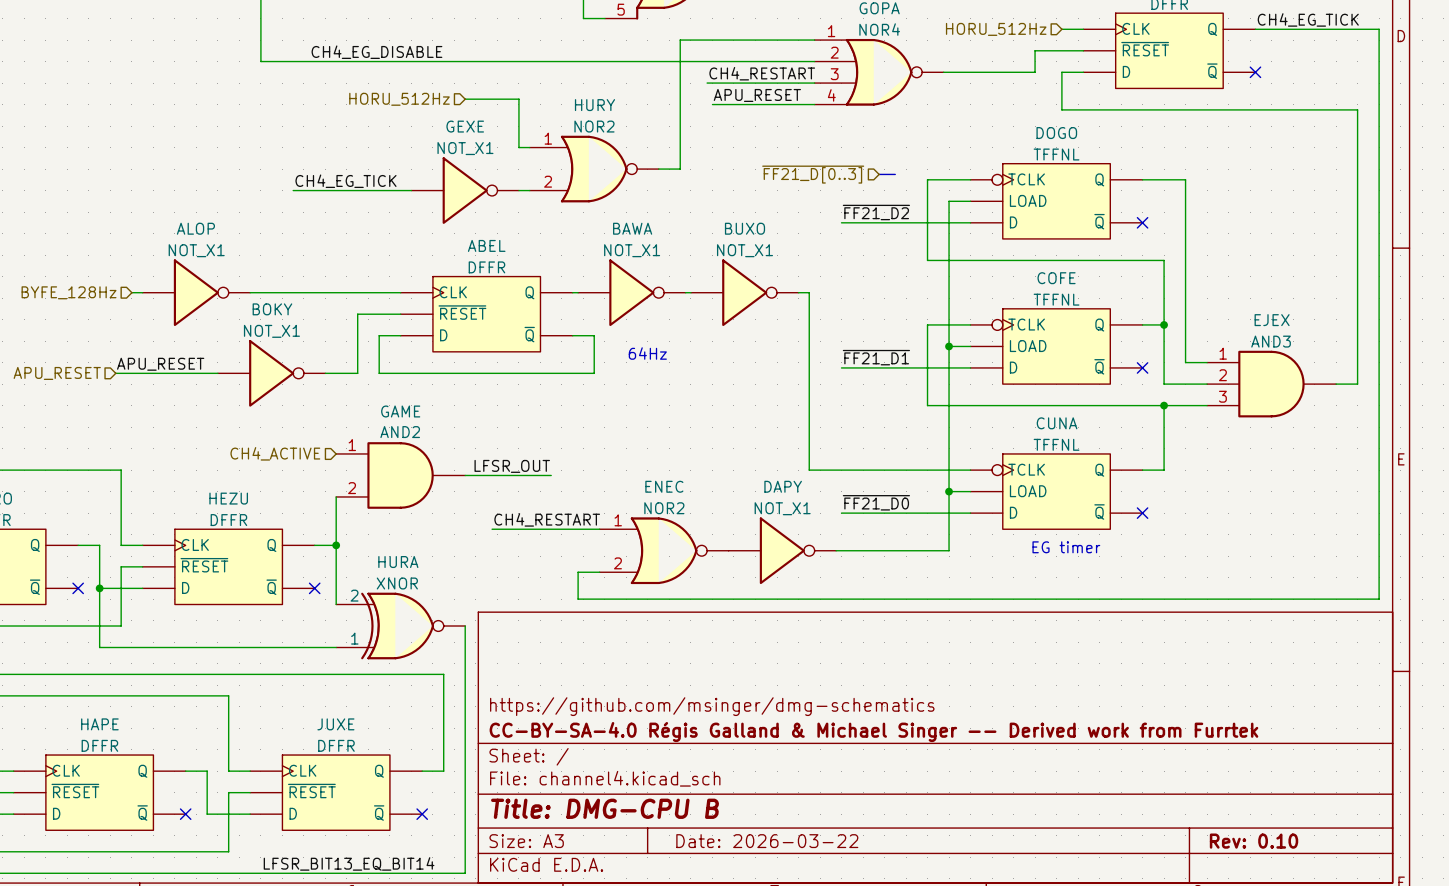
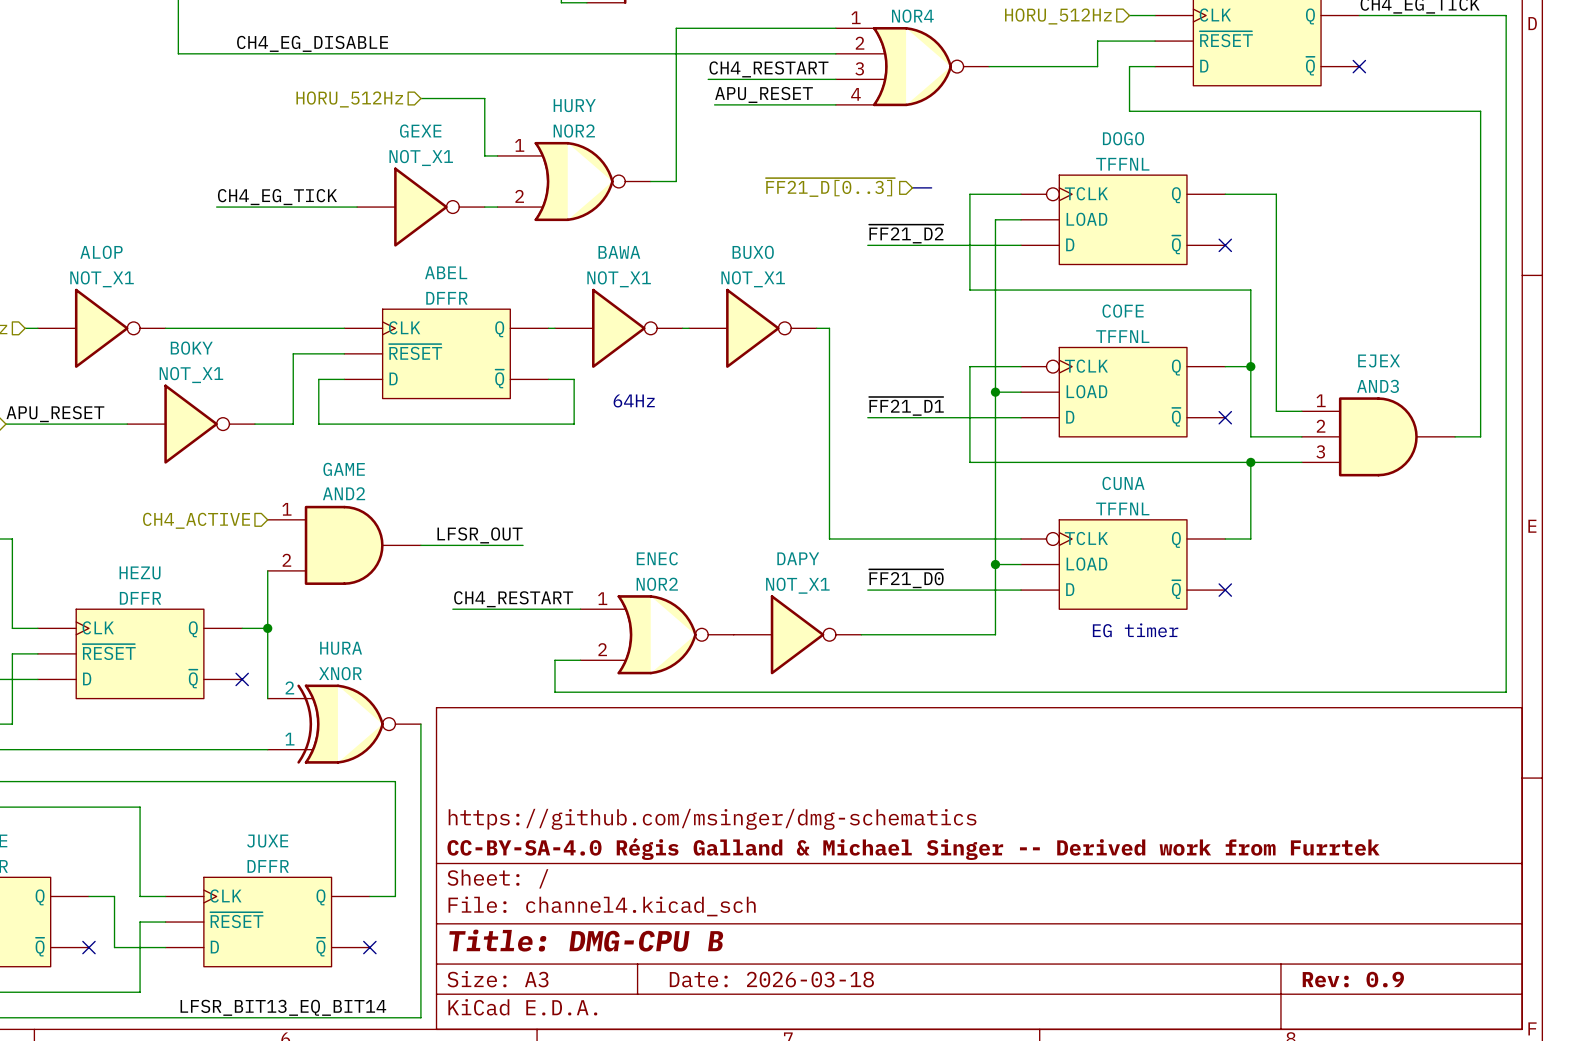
title block: Date: 2026-03-22 (767, 841) -> Date: 2026-03-18 (771, 979)
title block: Rev: 0.10 (1254, 841) -> Rev: 0.9 (1353, 979)

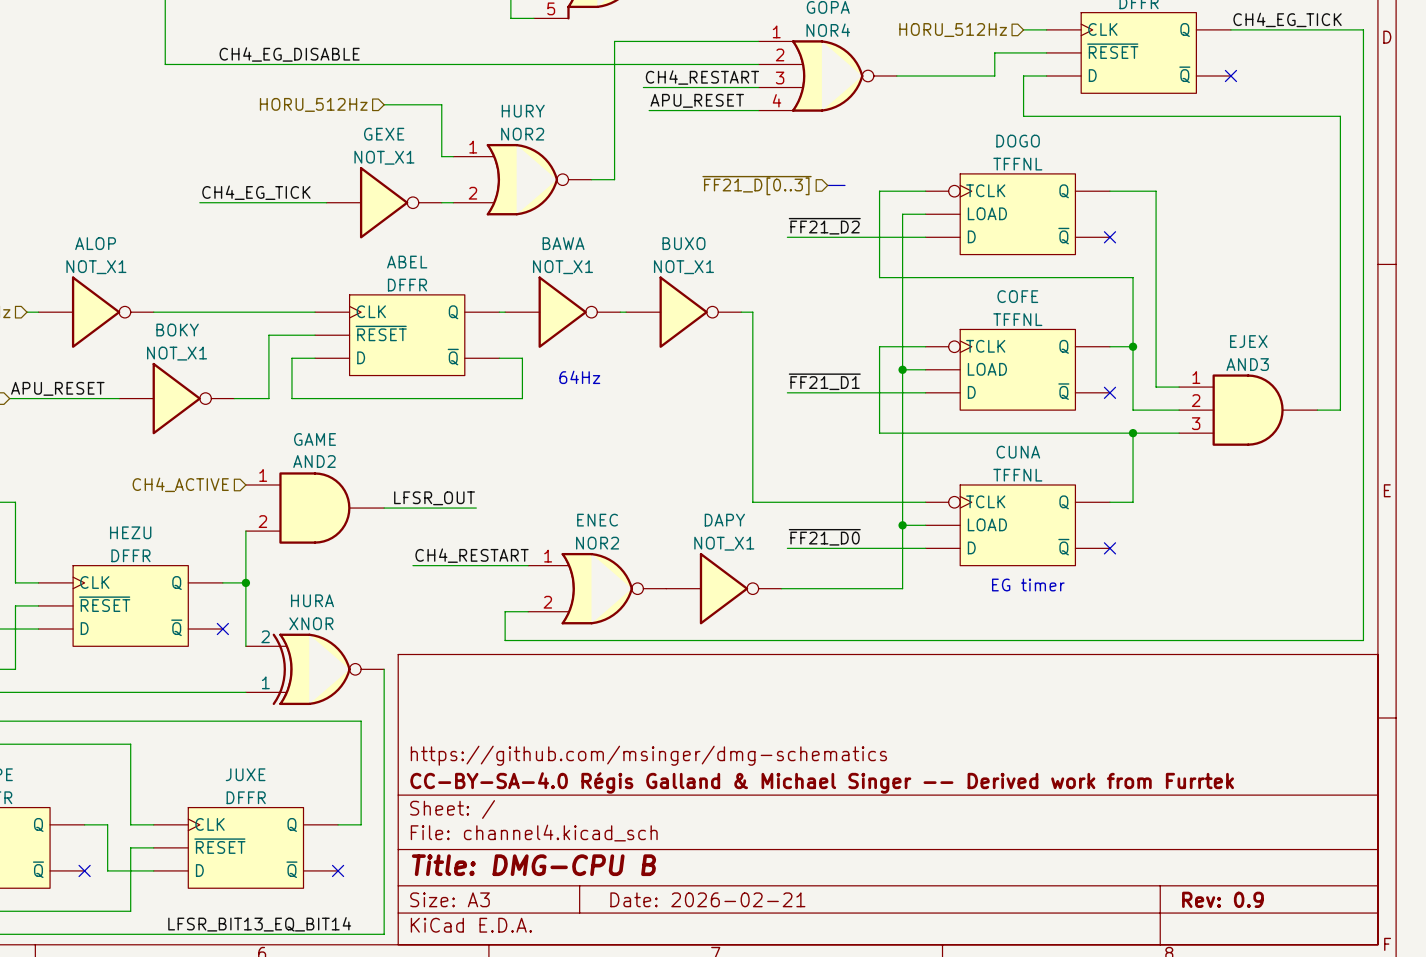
title block: Date: 2026-03-18 (771, 979) -> Date: 2026-02-21 (707, 899)

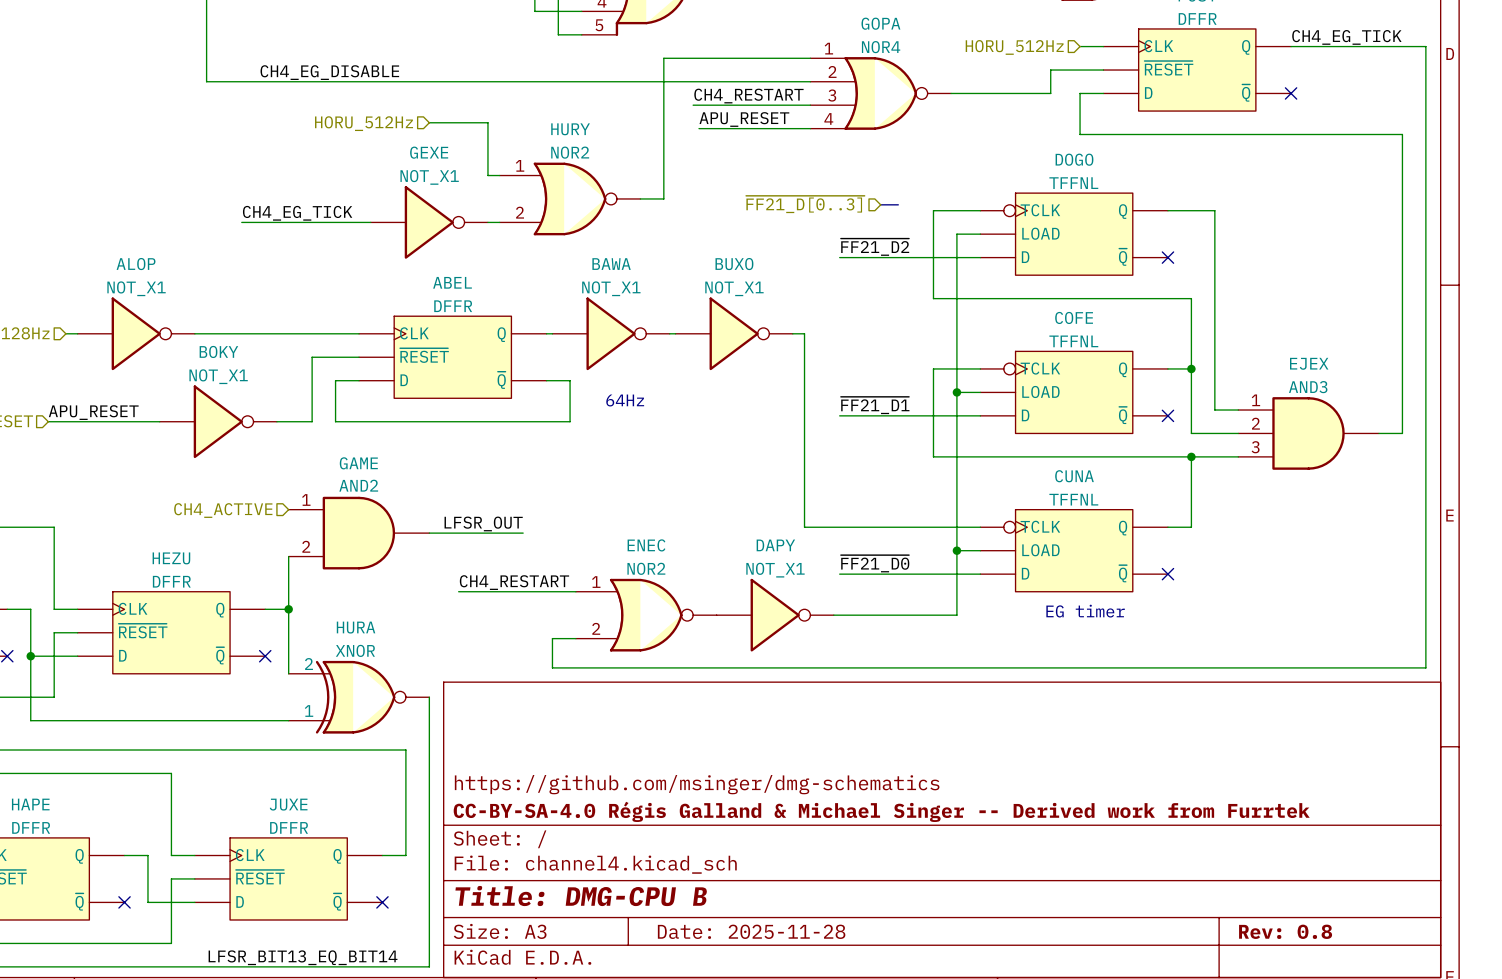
title block: Date: 2026-02-21 (707, 899) -> Date: 2025-11-28 (751, 931)
title block: Rev: 0.9 (1222, 899) -> Rev: 0.8 (1285, 931)

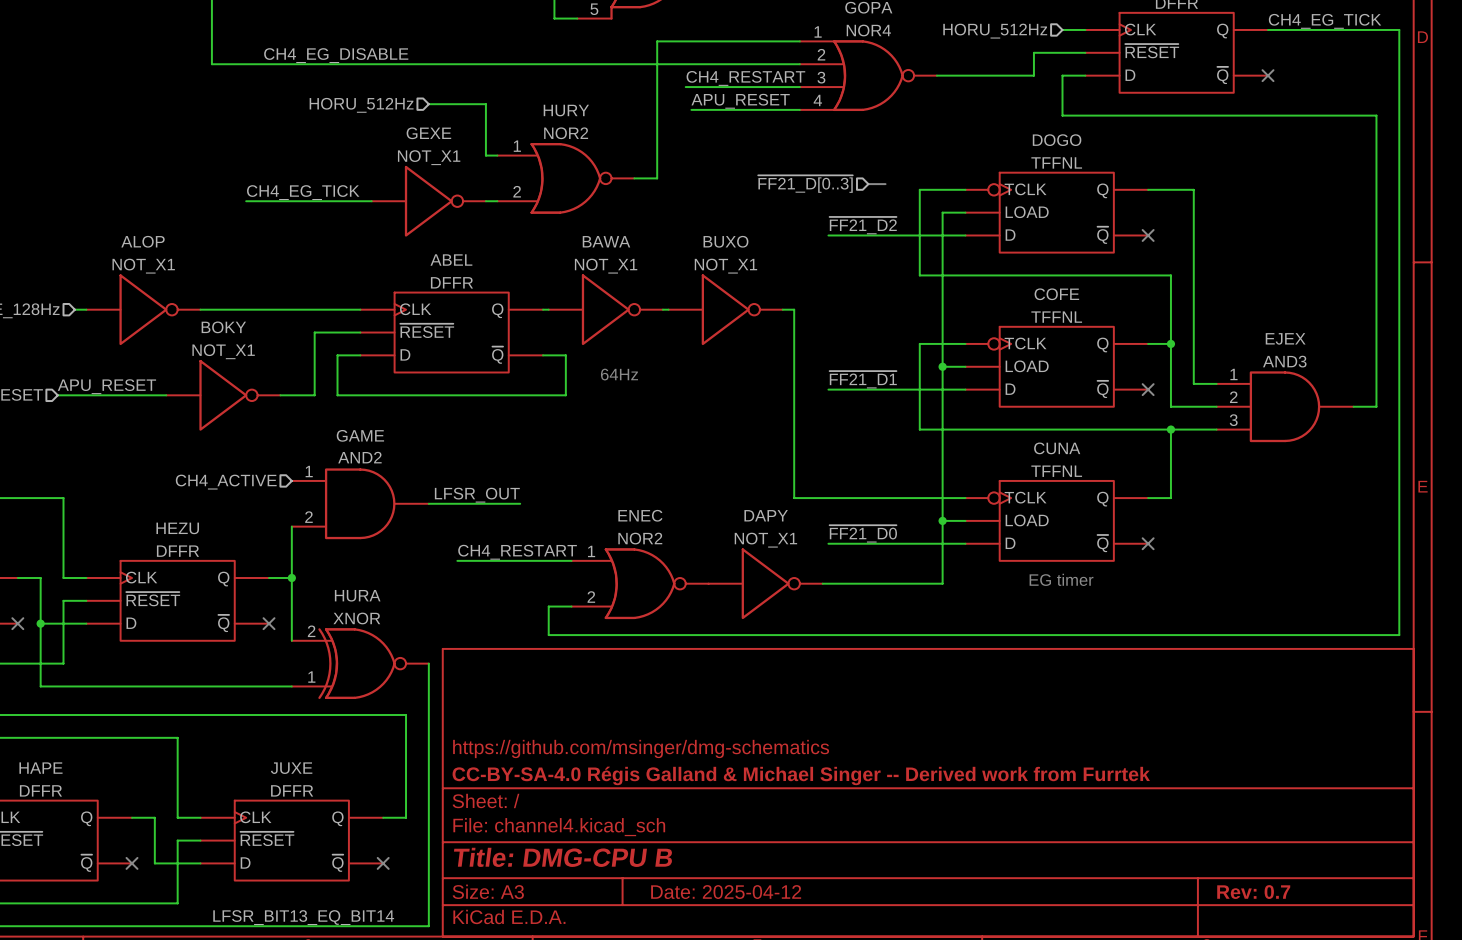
title block: Date: 2025-11-28 (751, 931) -> Date: 2025-04-12 (726, 892)
title block: Rev: 0.8 (1285, 931) -> Rev: 0.7 (1253, 892)

